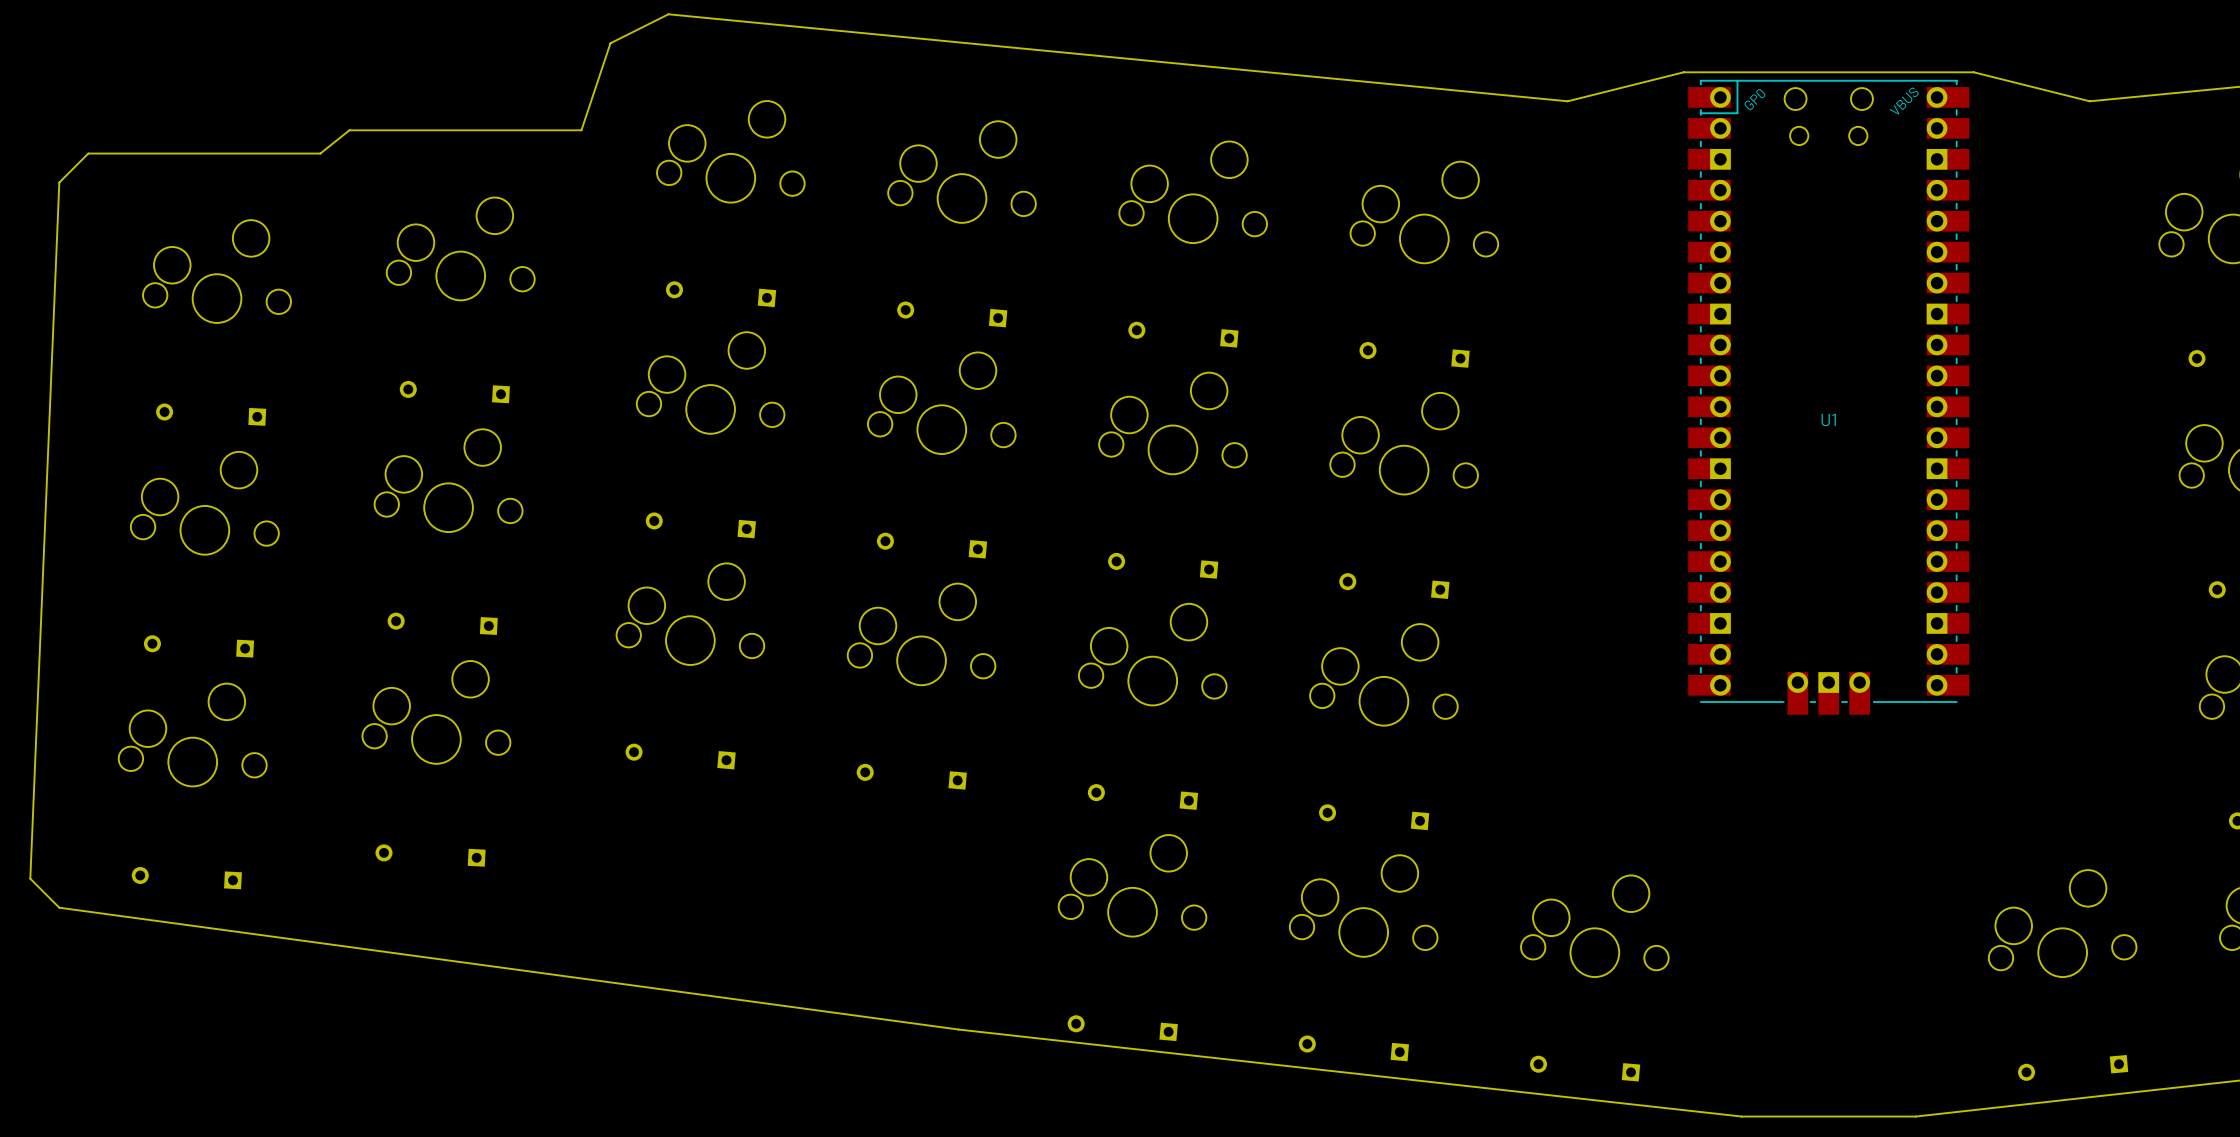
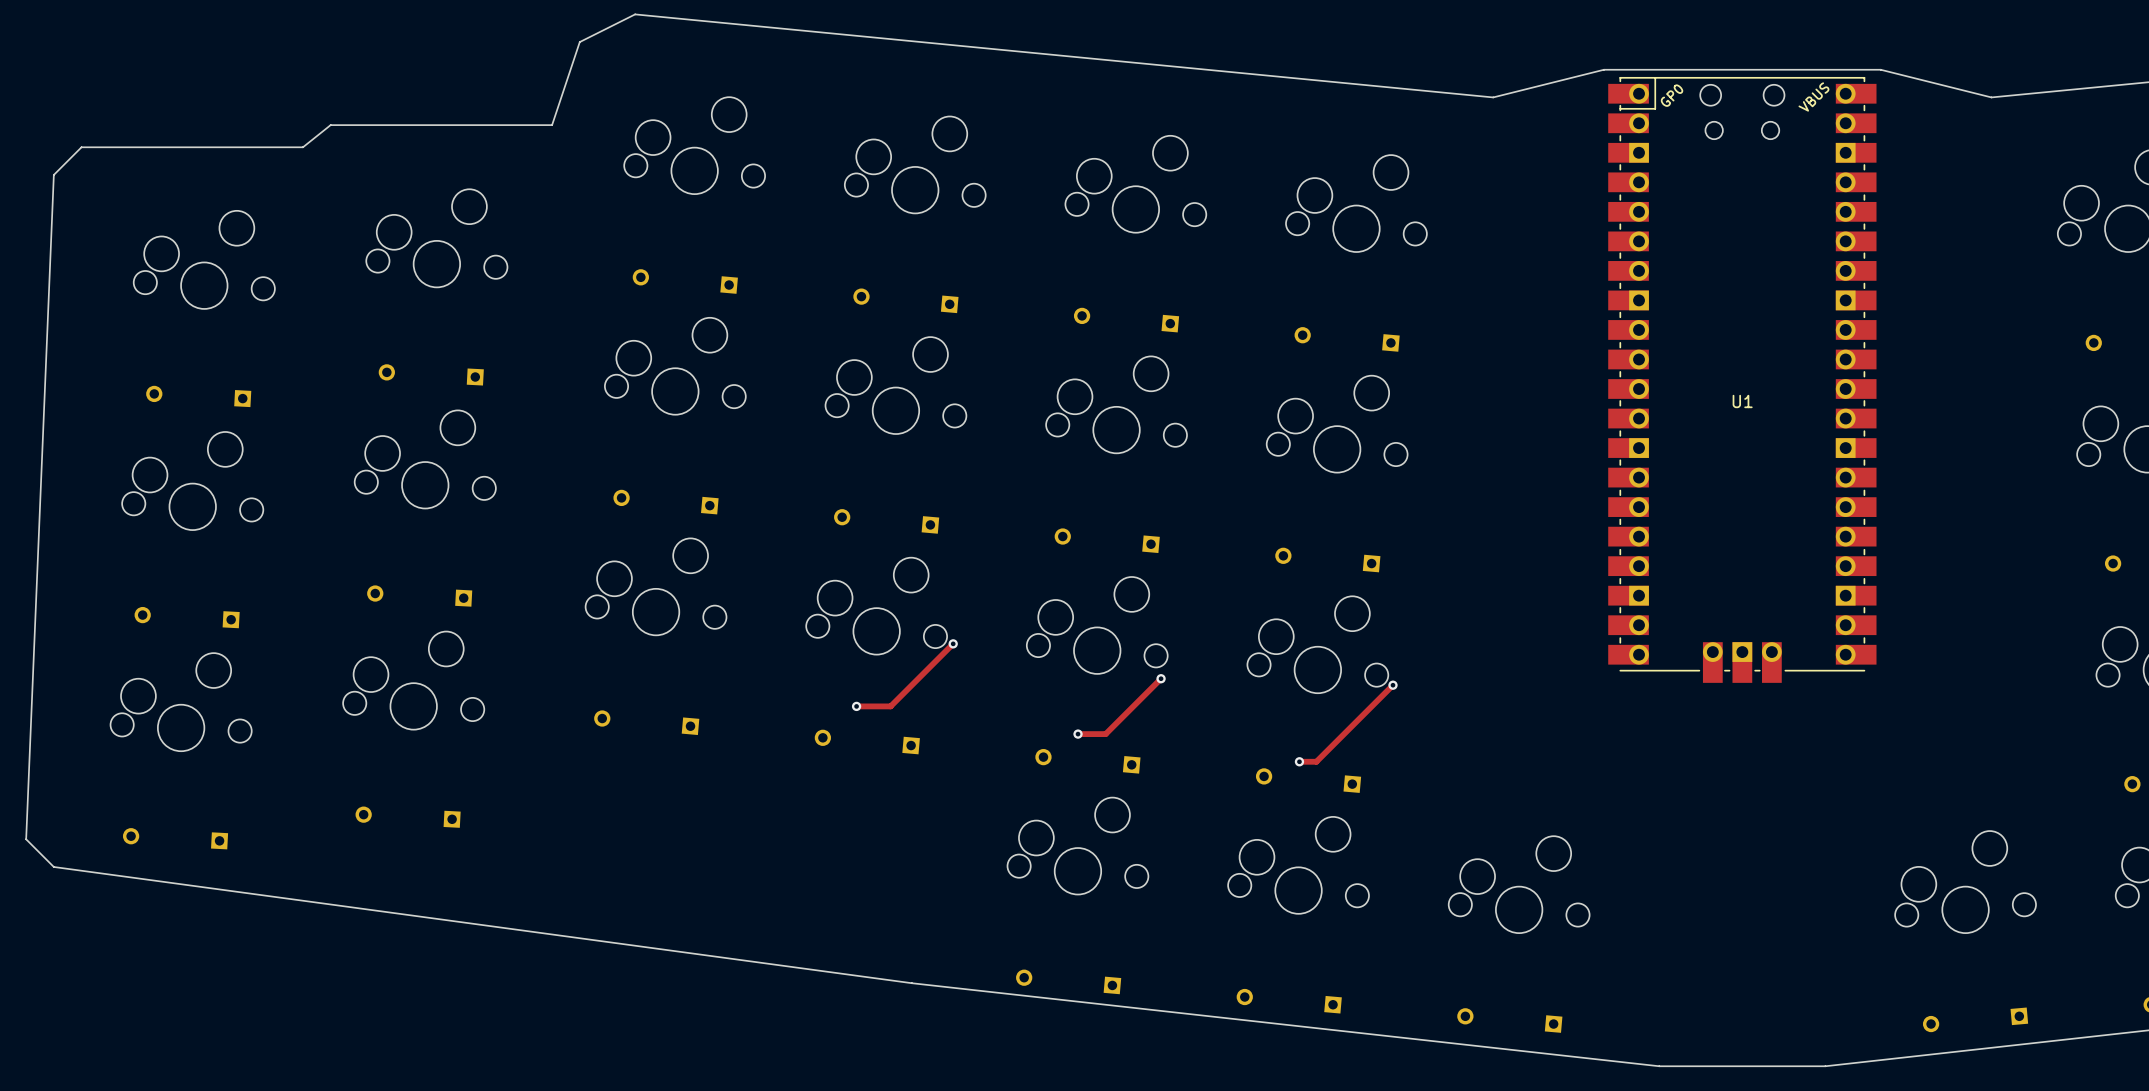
track: none -> (953, 643) (890, 706) (856, 706)
via: none -> (953, 643)
track: none -> (1161, 678) (1105, 734) (1078, 734)
via: none -> (1161, 678)
track: none -> (1392, 685) (1316, 761) (1299, 761)
via: none -> (1392, 685)
via: none -> (856, 706)
via: none -> (1078, 734)
via: none -> (1299, 761)

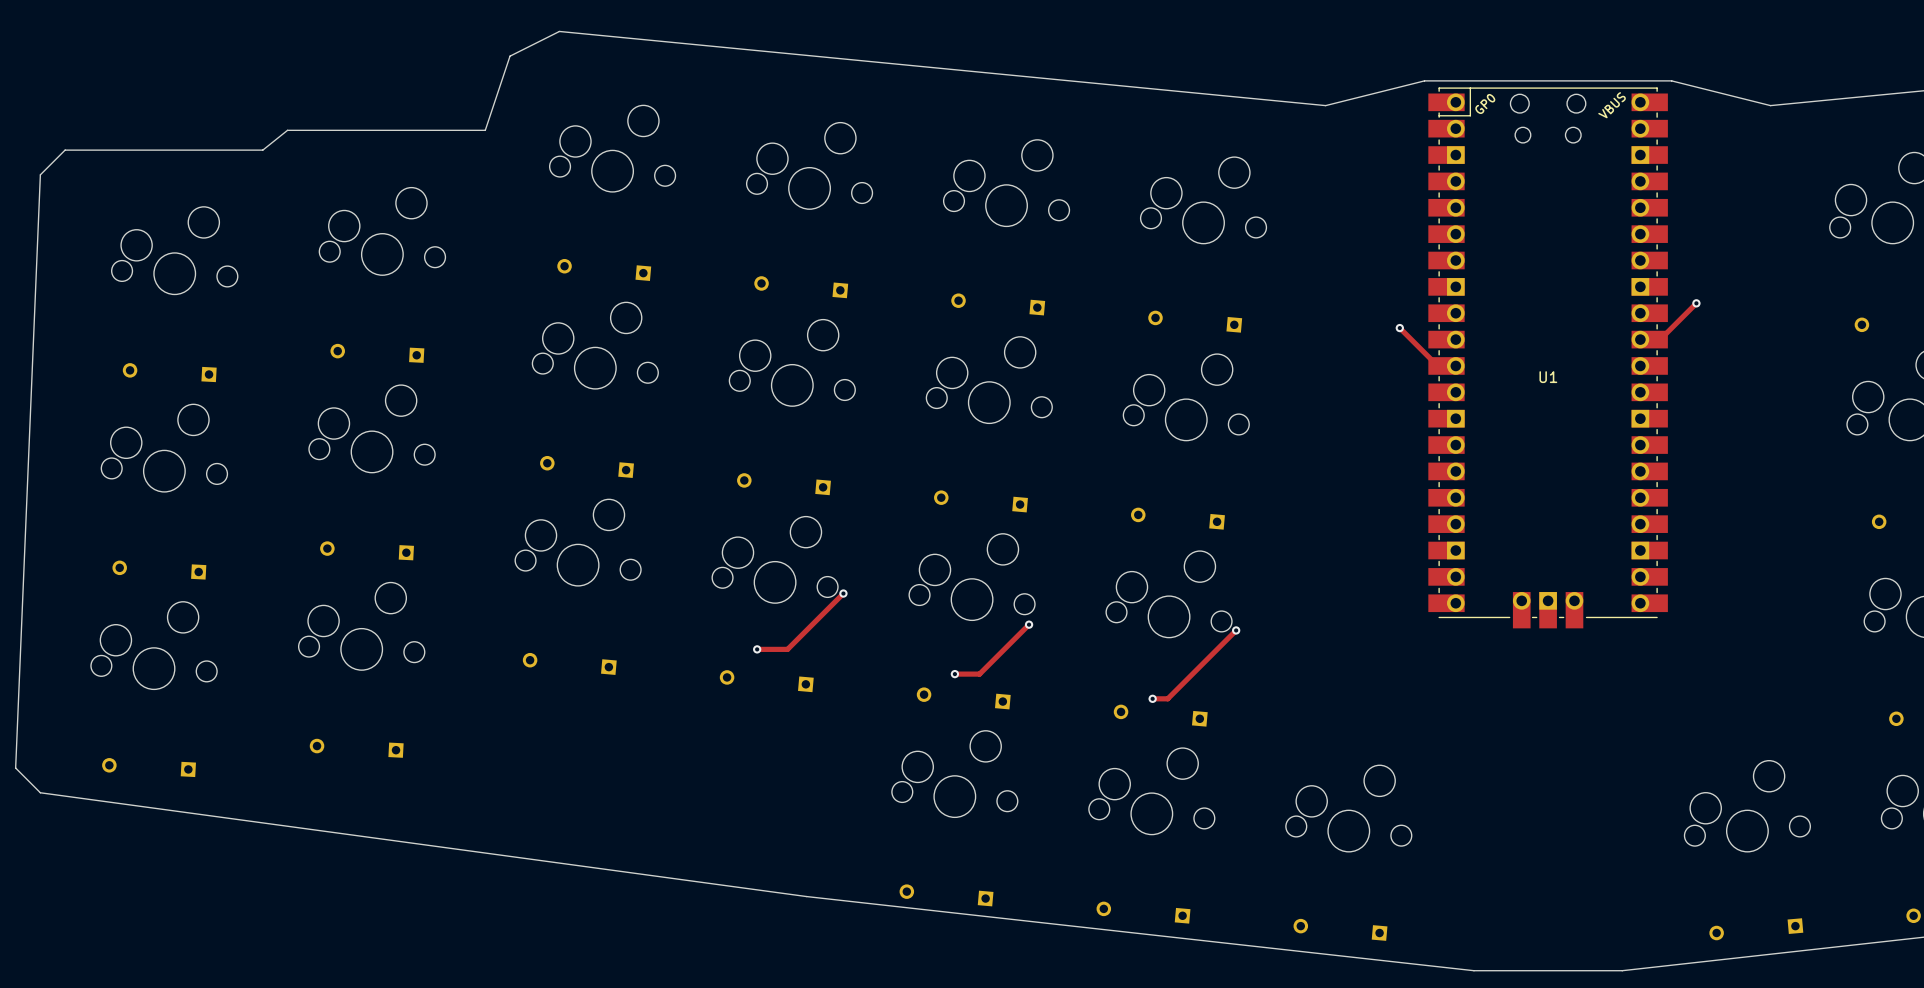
track: none -> (1696, 303) (1660, 339) (1640, 339)
via: none -> (1696, 303)
track: none -> (1399, 328) (1437, 365) (1455, 365)
via: none -> (1399, 328)

